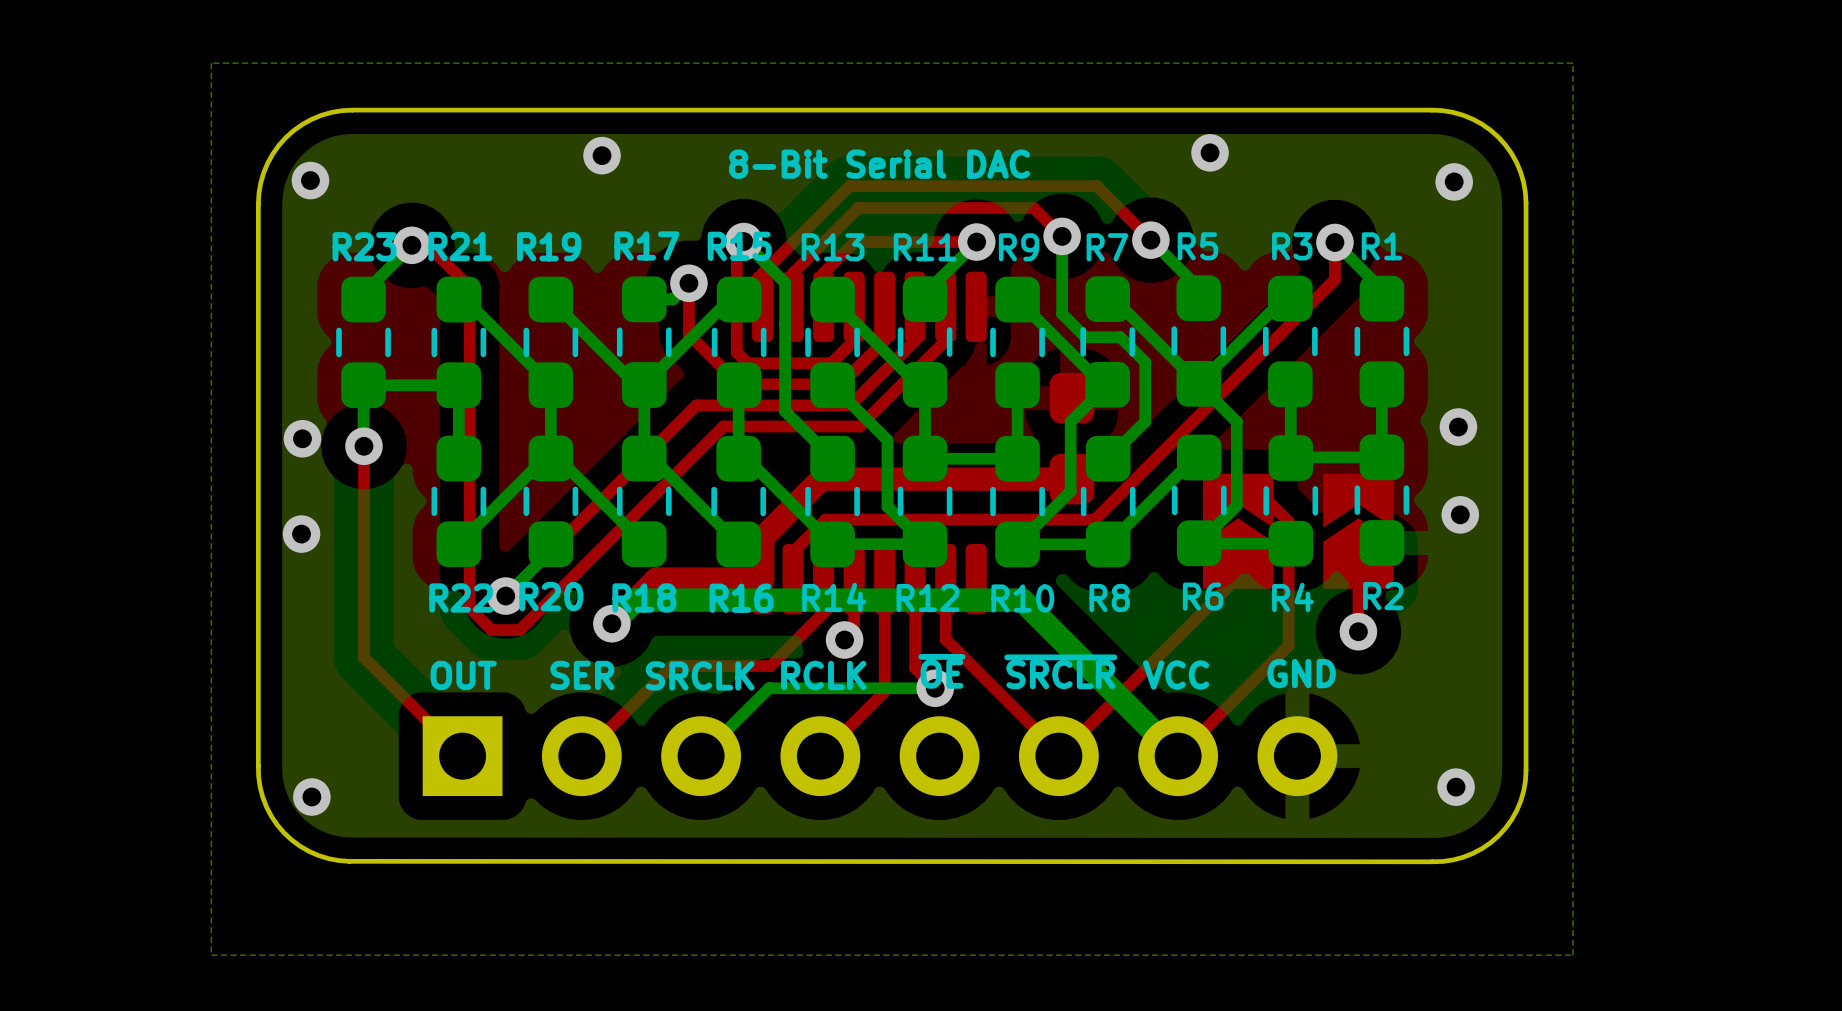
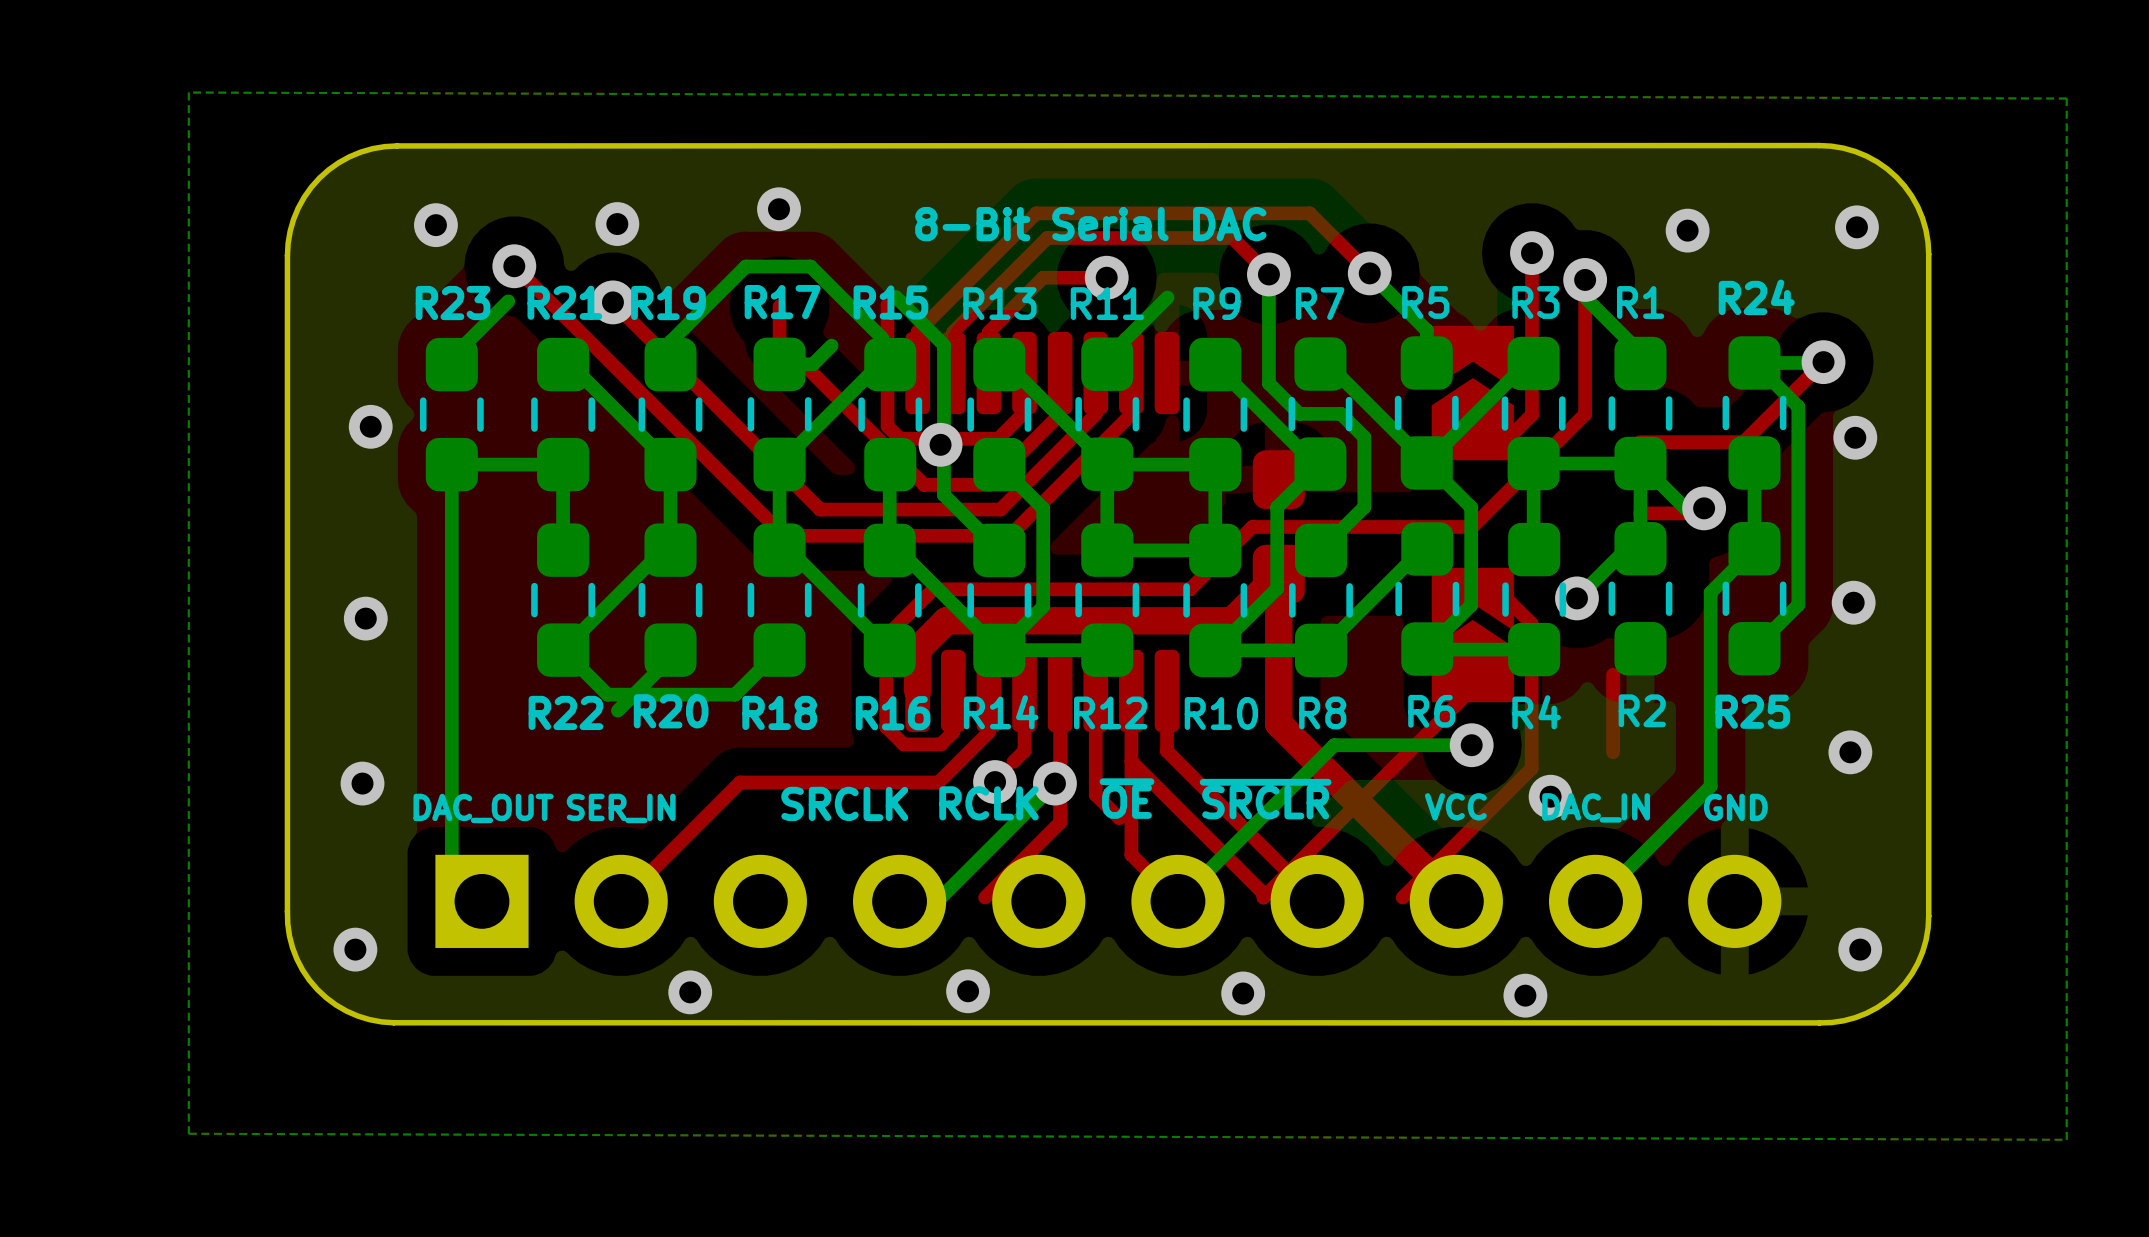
bottom zone outline: (1572, 63) (1572, 955) (211, 955) (211, 63) (1572, 63) -> (188, 92) (2066, 98) (2066, 1139) (188, 1133) (188, 92)
board edge: (1431, 110) (1452, 112) (1472, 119) (1498, 137) (1511, 153) (1520, 172) (1526, 203) (1525, 780) (1516, 810) (1505, 828) (1490, 842) (1463, 857) (1432, 861) (349, 861) (318, 855) (300, 846) (283, 832) (271, 816) (262, 797) (258, 776) (258, 193) (267, 163) (285, 137) (302, 124) (321, 115) (352, 110) -> (1698, 143) (1831, 146) (1866, 156) (1896, 177) (1911, 196) (1922, 218) (1928, 242) (1928, 928) (1917, 963) (1904, 983) (1877, 1007) (1843, 1020) (1819, 1022) (393, 1022) (357, 1016) (336, 1005) (317, 989) (302, 969) (292, 947) (287, 923) (288, 243) (293, 219) (304, 197) (319, 178) (338, 162) (372, 148) (438, 143)
via: (1210, 152) -> none
via position: (602, 155) -> (779, 209)
text position: 8-Bit Serial DAC (879, 164) -> 8-Bit Serial DAC (1090, 224)
via: none -> (617, 224)
via position: (310, 180) -> (435, 225)
via position: (1454, 181) -> (1687, 230)
via: none -> (1856, 227)
top track: none -> (1531, 253) (1531, 414) (1513, 432) (1472, 432)
via: none -> (1531, 253)
via: none -> (1106, 277)
top track: (1062, 236) (1033, 208) (858, 208) (793, 273) -> (1268, 274) (1232, 238) (1047, 238) (953, 333)
bottom track: (1062, 236) (1062, 313) (1085, 337) (1120, 337) (1125, 341) -> (1268, 274) (1268, 383) (1299, 413) (1340, 413)
via position: (1062, 236) -> (1268, 274)
top track: (1150, 240) (1096, 186) (849, 186) (762, 273) -> (1369, 273) (1309, 213) (1036, 213) (917, 333)
bottom track: (1150, 240) (1198, 288) -> (1369, 273) (1426, 330) (1426, 351)
via position: (1150, 240) -> (1369, 273)
via: (743, 241) -> none
top track: (976, 242) (854, 242) (823, 273) -> (1106, 277) (1043, 277) (988, 333)
via: (976, 242) -> none
top track: (1334, 242) (1334, 279) (1094, 519) (825, 519) (793, 552) (793, 579) -> (1585, 279) (1585, 414) (1472, 526) (1252, 526) (1190, 589) (933, 589) (886, 636) (886, 726) (903, 744) (940, 744) (953, 732) (953, 690)
via position: (1334, 242) -> (1585, 279)
top track: (411, 245) (427, 245) (469, 287) (469, 608) (491, 630) (519, 630) (723, 426) (859, 426) (945, 340) -> (514, 266) (783, 535) (1009, 535) (1131, 412)
via position: (411, 245) -> (514, 266)
via: none -> (612, 302)
top track: (688, 283) (688, 334) (738, 384) (840, 384) (884, 340) -> (779, 306) (779, 340) (924, 484) (989, 484) (1060, 412)
via: (688, 283) -> none
top track: none -> (1823, 362) (1743, 442) (1639, 442)
bottom track: none -> (1823, 362) (1754, 362) (1798, 406) (1798, 604) (1754, 648)
via: none -> (1823, 362)
bottom track: (550, 299) (636, 385) (644, 385) -> (670, 364) (670, 341) (745, 266) (810, 266) (882, 337) (882, 364)
bottom track: (832, 299) (917, 384) (925, 384) -> (999, 364) (1007, 364) (1107, 464) (1215, 464)
top track: (915, 340) (850, 405) (696, 405) (505, 596) -> (1095, 412) (1000, 509) (820, 509) (612, 302)
R24: none -> (1754, 412)
via: none -> (370, 426)
via: none -> (1855, 437)
via: none -> (940, 444)
bottom track: none -> (1754, 462) (1754, 548) (1710, 592) (1710, 786) (1595, 901)
bottom track: (1290, 384) (1290, 458) (1370, 457) -> (1576, 598) (1626, 548)
bottom track: (870, 422) (887, 440) (887, 506) (925, 544) -> (1043, 508) (1043, 606) (999, 650)
top track: none -> (1704, 508) (1699, 513) (1639, 513)
bottom track: none -> (1704, 508) (1685, 508) (1640, 463) (1533, 463) (1533, 549)
via position: (1458, 427) -> (1704, 508)
via: (302, 438) -> none
bottom track: none -> (451, 535) (451, 871) (481, 901)
top track: (363, 446) (363, 657) (462, 756) -> none
via: (363, 446) -> none
bottom track: (558, 458) (644, 544) -> none
top track: (1072, 479) (821, 479) (762, 537) (762, 543) -> (1456, 901) (1278, 723) (1278, 574) (1232, 620) (946, 620) (917, 649)
via: none -> (1576, 598)
R25: none -> (1754, 598)
via: none -> (1853, 602)
via: (1460, 514) -> none
part position: (1358, 531) -> (1472, 393)
via position: (301, 534) -> (365, 618)
bottom track: none -> (770, 650) (779, 650) (735, 694) (607, 694) (563, 650)
top track: (762, 579) (656, 579) (611, 623) -> none
top track: none -> (1167, 690) (1167, 751) (1317, 901)
via: (505, 596) -> none
top track: (823, 612) (770, 666) (671, 666) (581, 756) -> (988, 730) (938, 782) (740, 782) (621, 901)
bottom track: (611, 623) (635, 600) (1022, 600) (1178, 756) -> none
via: (611, 623) -> none
bottom track: none -> (1471, 745) (1334, 745) (1177, 901)
via: none -> (1471, 745)
via: (1358, 631) -> none
via: none -> (1850, 752)
top track: none -> (1131, 761) (1131, 854) (1177, 901)
via: (844, 640) -> none
via: none -> (995, 782)
via: none -> (362, 783)
bottom track: none -> (1054, 783) (937, 901) (899, 901)
via: none -> (1054, 783)
via: none -> (1550, 796)
text position: GND (1301, 673) -> GND (1735, 807)
text position: VCC (1176, 674) -> VCC (1455, 806)
text: OUT (463, 675) -> none
text: SER (582, 675) -> SER_IN (621, 808)
text: none -> DAC_OUT (483, 808)
text: none -> DAC_IN (1596, 807)
bottom track: (935, 688) (769, 688) (701, 756) -> none
via: (935, 688) -> none
part footprint: [422, 716, 1338, 797] -> [435, 854, 1782, 948]
via: (1456, 787) -> none
via position: (311, 797) -> (355, 949)
via: none -> (1860, 949)
via: none -> (968, 991)
via: none -> (690, 992)
via: none -> (1243, 993)
via: none -> (1525, 995)

